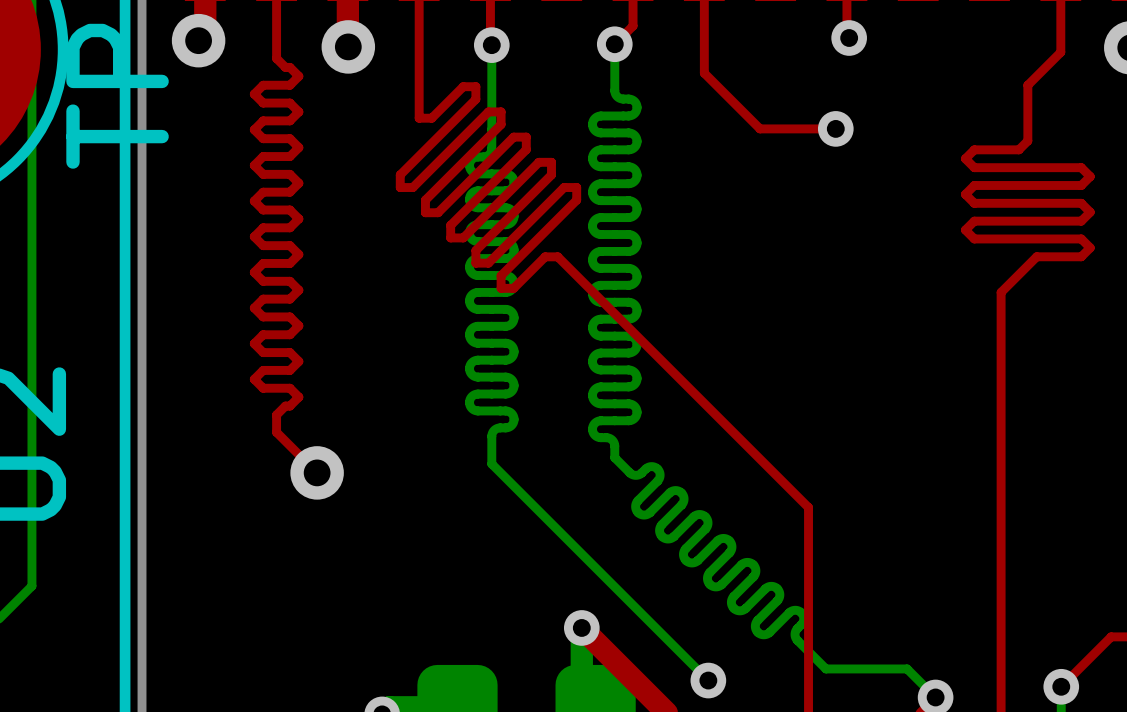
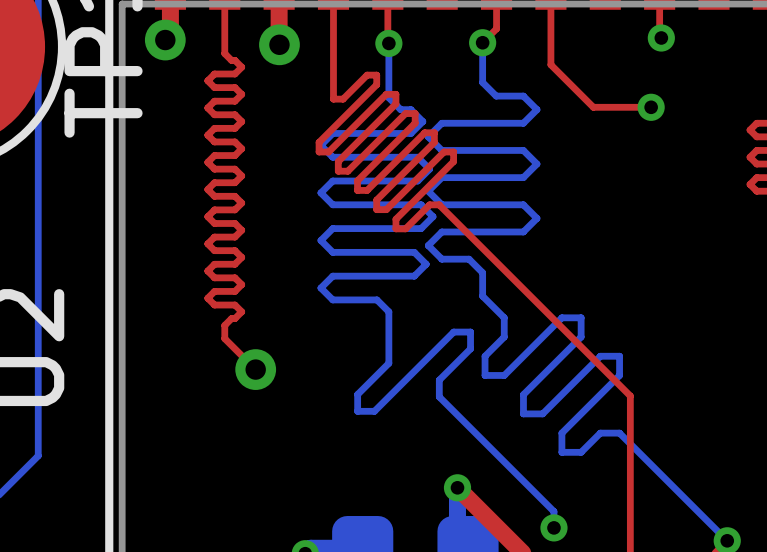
bottom track: (614, 90) (619, 97) (634, 101) (636, 106) (635, 111) (629, 115) (597, 116) (593, 121) (592, 126) (599, 132) (632, 134) (636, 138) (636, 143) (633, 148) (628, 149) -> (482, 78) (482, 82) (496, 96) (523, 96) (536, 109) (523, 123) (493, 123)
bottom track: (491, 116) (491, 151) (486, 156) (472, 158) (469, 167) (476, 173) (508, 174) (513, 179) (513, 184) (506, 190) (474, 191) (470, 195) (469, 200) (475, 207) (510, 209) (513, 218) (510, 222) (505, 224) -> (388, 97) (400, 109) (410, 109) (422, 121) (410, 133) (332, 133) (320, 145) (332, 157) (417, 157) (429, 169) (417, 181) (399, 180)
bottom track: (600, 149) (595, 151) (592, 156) (595, 165) (630, 167) (635, 171) (636, 176) (630, 183) (597, 184) (592, 189) (593, 196) (599, 200) (630, 200) (635, 204) (636, 210) (630, 217) (597, 218) (593, 222) (593, 229) (599, 234) (630, 234) (635, 238) (636, 244) (630, 251) (597, 252) (593, 256) (592, 262) (599, 268) (630, 268) (635, 271) (637, 276) (635, 281) (630, 285) (597, 285) (593, 290) (592, 295) (599, 302) (630, 302) (635, 305) (637, 310) (635, 315) (630, 318) (597, 319) (593, 323) (592, 328) (598, 335) (631, 336) (637, 344) (635, 349) (630, 352) (597, 353) (593, 357) (592, 362) (598, 369) (631, 370) (637, 378) (635, 383) (630, 386) (597, 387) (593, 391) (592, 396) (598, 403) (631, 404) (637, 412) (635, 417) (630, 420) (597, 421) (593, 425) (592, 430) (596, 436) (612, 440) (614, 445) (614, 457) (631, 474) (638, 474) (650, 466) (658, 470) (658, 480) (636, 502) (636, 511) (641, 514) (646, 514) (671, 491) (676, 490) (681, 493) (683, 497) (682, 503) (660, 526) (660, 535) (665, 538) (670, 538) (695, 515) (700, 514) (705, 516) (707, 521) (706, 527) (685, 549) (684, 558) (689, 562) (694, 562) (719, 539) (724, 538) (729, 540) (731, 545) (730, 551) (709, 573) (707, 579) (711, 585) (718, 586) (743, 563) (748, 562) (753, 564) (755, 569) (754, 575) (731, 599) (732, 606) (737, 610) (745, 608) (767, 587) (772, 586) (777, 588) (779, 593) (778, 599) (755, 623) (755, 629) (759, 633) (768, 633) (790, 612) (797, 610) (802, 613) (803, 618) (795, 631) (795, 638) (825, 668) (907, 668) -> (472, 123) (441, 123) (428, 136) (441, 150) (523, 150) (536, 164) (523, 177) (441, 177) (428, 191) (441, 204) (523, 204) (536, 218) (523, 231) (441, 231) (428, 245) (441, 259) (469, 259) (482, 272) (482, 296) (504, 317) (504, 337) (485, 356) (485, 375) (504, 375) (561, 317) (581, 317) (581, 337) (523, 394) (523, 413) (542, 413) (600, 356) (619, 356) (619, 375) (561, 433) (561, 452) (581, 452) (600, 433) (619, 433) (705, 519)
bottom track: (477, 224) (472, 226) (469, 230) (472, 239) (507, 241) (512, 244) (514, 250) (508, 257) (475, 258) (469, 265) (470, 271) (474, 274) (507, 275) (514, 282) (512, 288) (508, 291) (475, 292) (469, 299) (470, 305) (474, 308) (507, 309) (514, 316) (512, 322) (508, 325) (475, 326) (469, 333) (470, 339) (474, 342) (506, 343) (513, 349) (513, 354) (508, 359) (476, 360) (469, 366) (470, 371) (474, 376) (506, 377) (513, 383) (513, 388) (508, 393) (476, 394) (470, 399) (470, 405) (474, 410) (506, 411) (512, 415) (514, 420) (511, 425) (496, 429) (491, 436) -> (378, 180) (332, 181) (320, 192) (332, 204) (421, 204) (433, 216) (421, 228) (332, 228) (320, 240) (332, 252) (414, 252) (426, 264) (414, 276) (332, 276) (320, 288) (332, 299) (376, 299) (388, 311) (388, 341)
bottom track: (491, 463) (708, 680) -> (388, 363) (357, 394) (357, 411) (374, 411) (453, 332) (470, 332) (470, 348) (439, 380) (439, 396) (553, 511) (553, 527)

